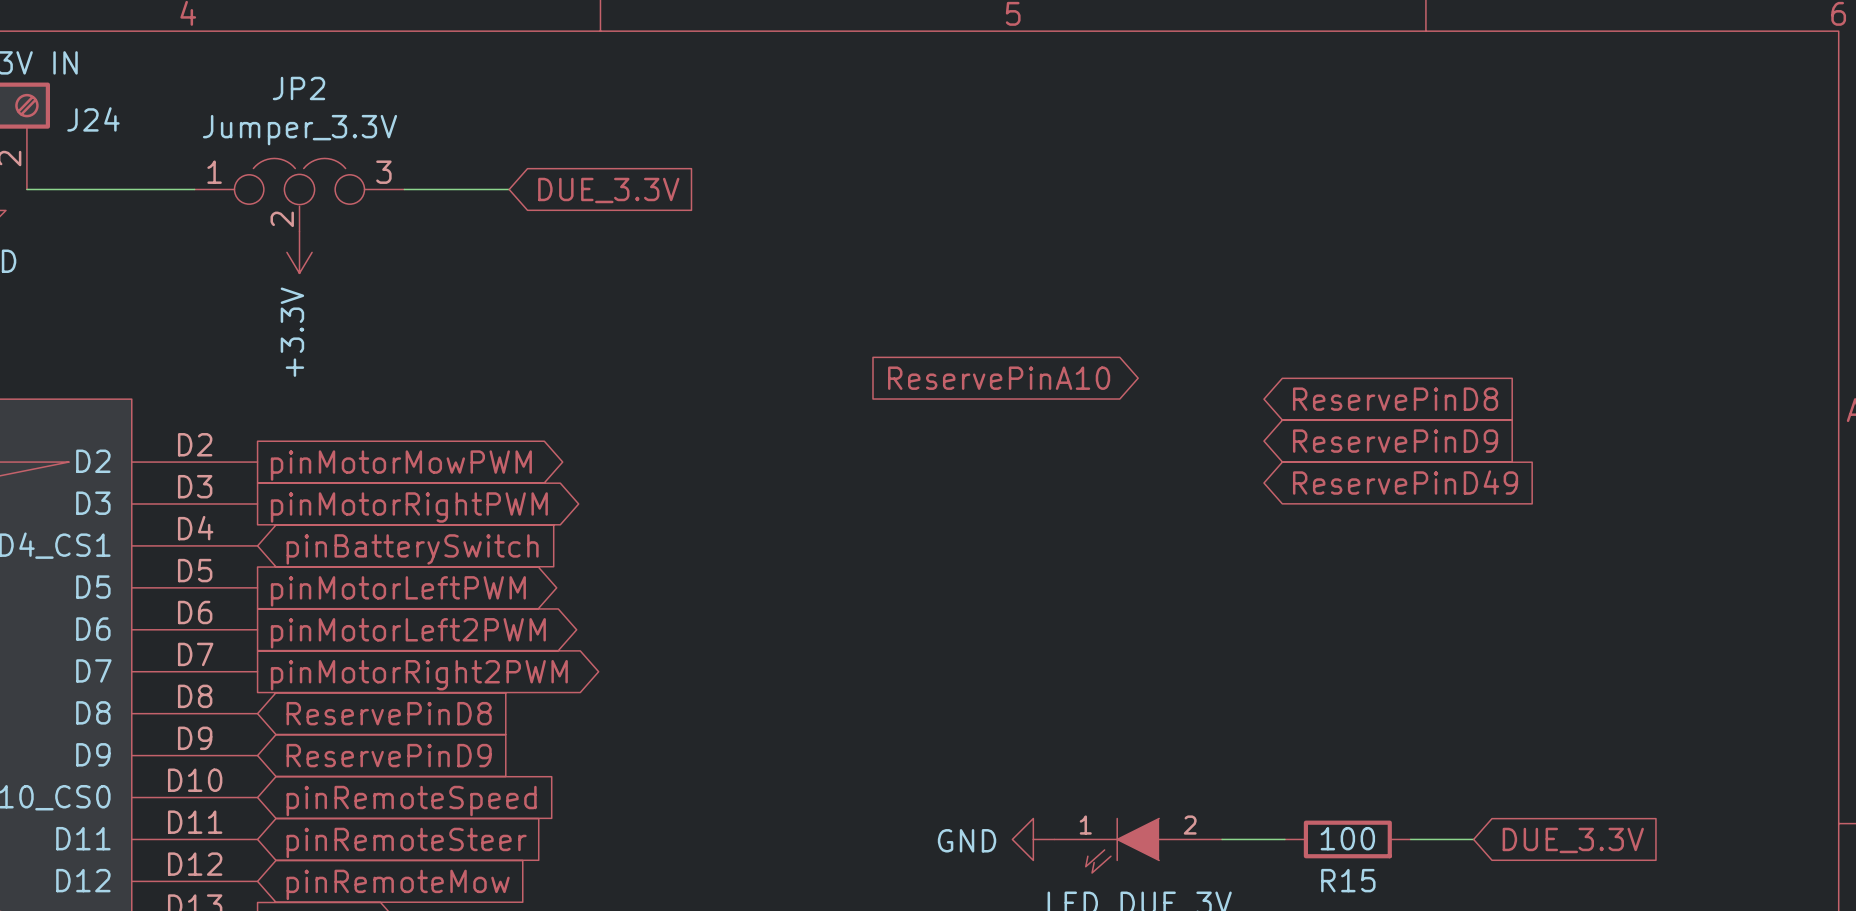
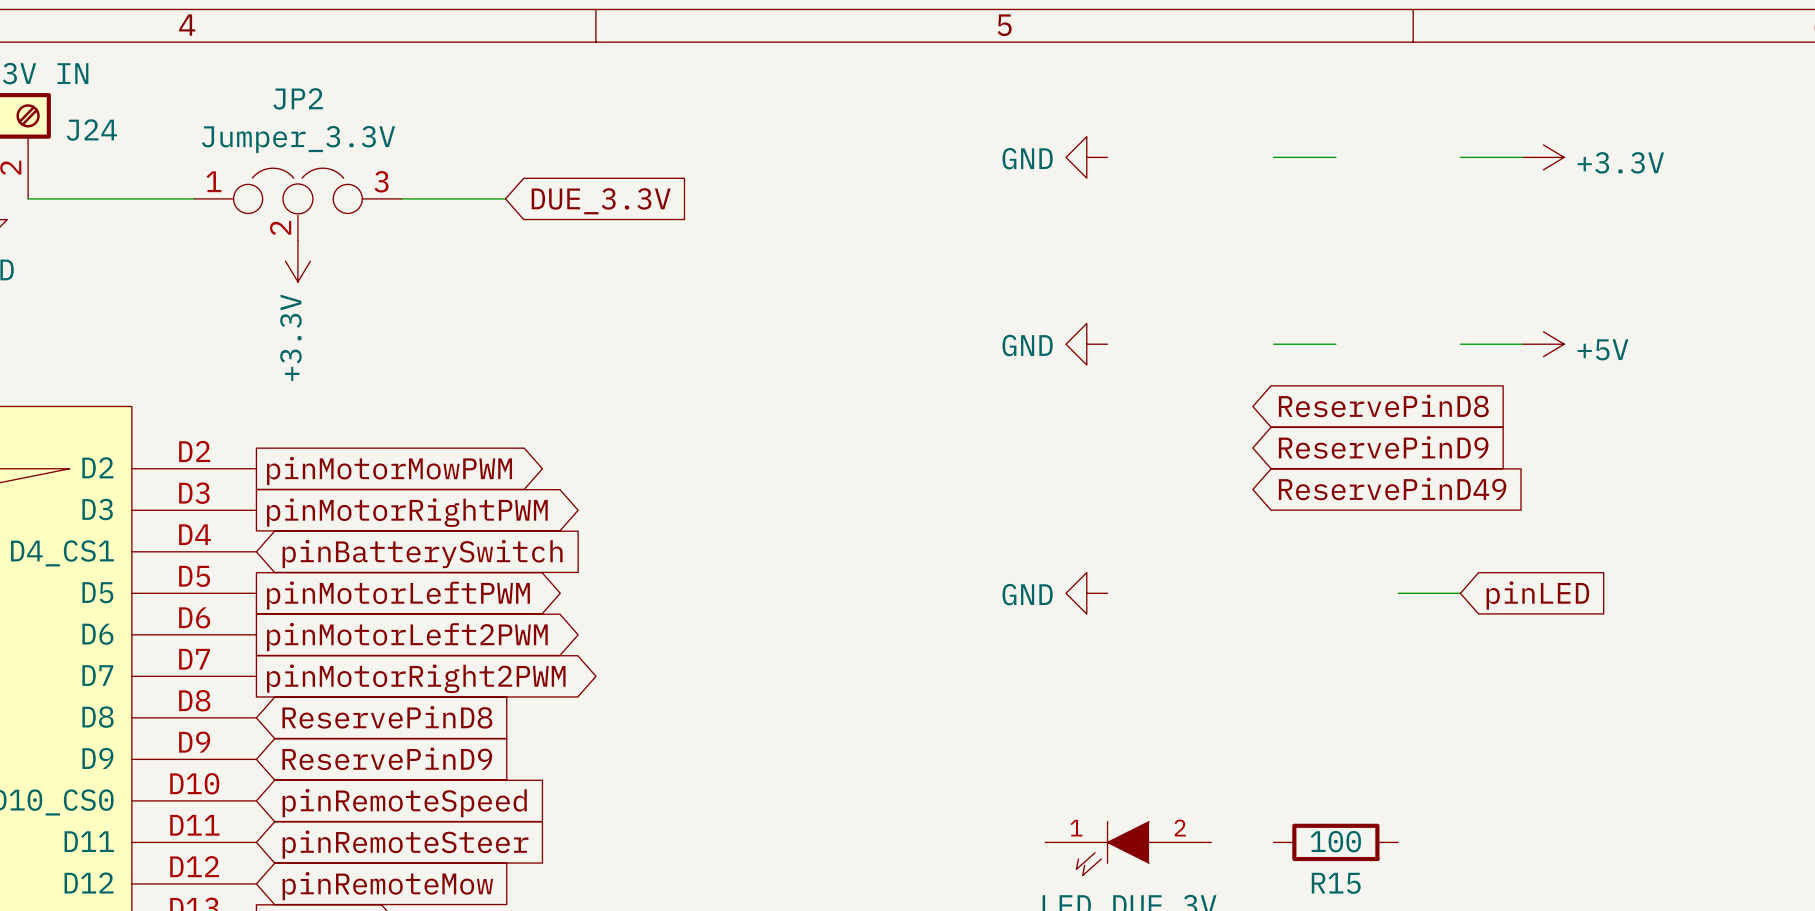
power symbol: none -> GND (1086, 157)
wire: none -> (1273, 157) (1335, 157)
wire: none -> (1460, 157) (1522, 157)
power symbol: none -> +3.3V (1543, 157)
power symbol: none -> GND (1086, 344)
wire: none -> (1273, 344) (1335, 344)
wire: none -> (1460, 344) (1522, 344)
power symbol: none -> +5V (1543, 344)
global label: ReservePinA10 (999, 378) -> none
power symbol: none -> GND (1086, 593)
global label: none -> pinLED (1537, 595)
power symbol: GND (1033, 839) -> none
wire: (1222, 839) (1284, 839) -> none
wire: (1410, 839) (1473, 839) -> (1398, 593) (1460, 593)
global label: DUE_3.3V (1573, 840) -> none

